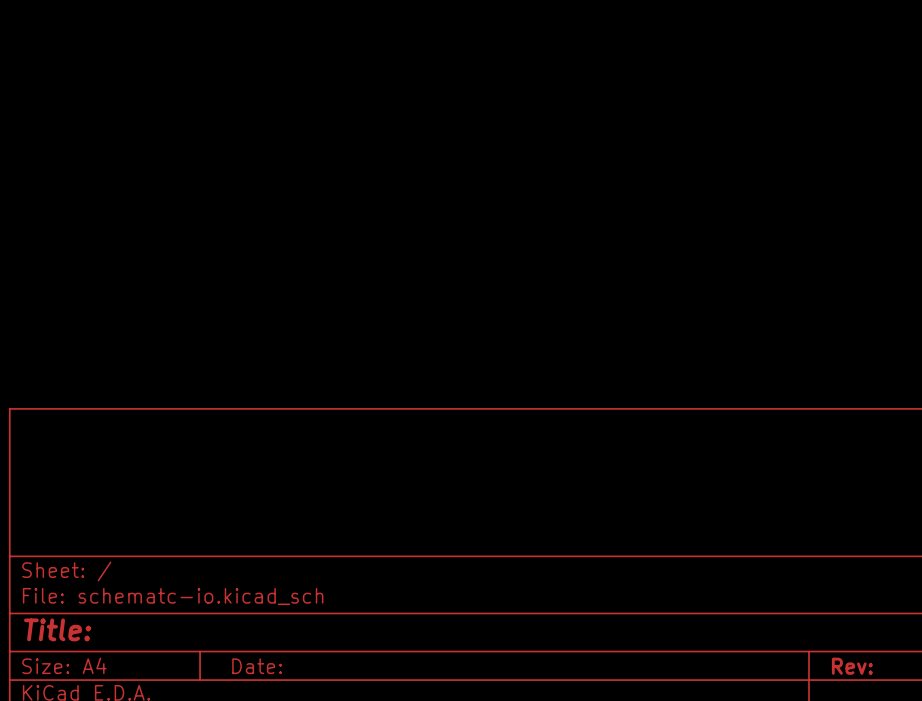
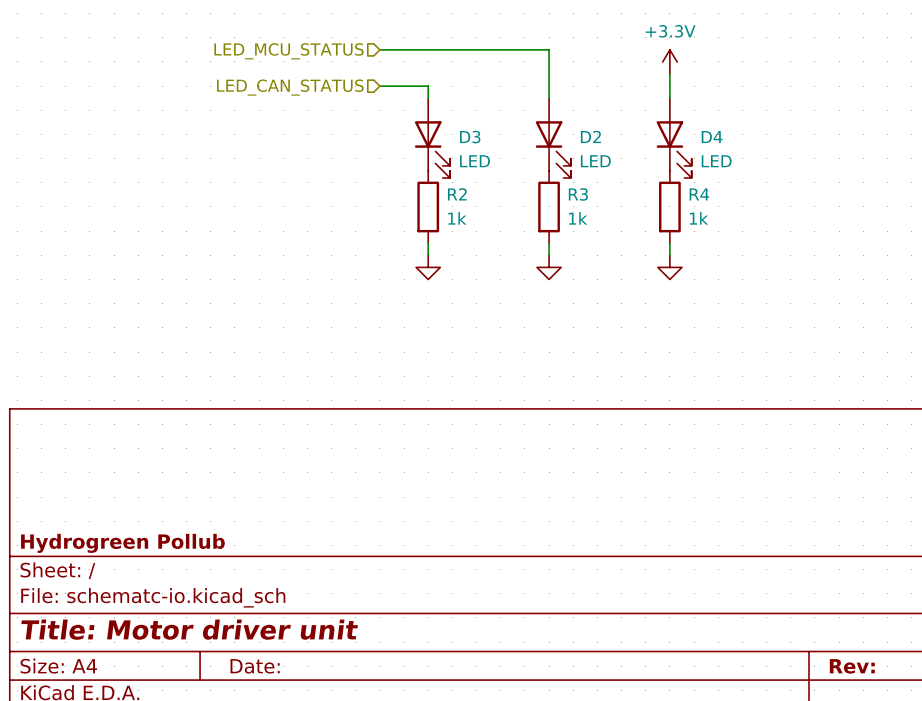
wire: none -> (379, 49) (549, 49) (549, 98)
hierarchical label: none -> LED_MCU_STATUS (288, 51)
power symbol: none -> +3.3V (669, 61)
wire: none -> (669, 74) (669, 98)
hierarchical label: none -> LED_CAN_STATUS (290, 87)
wire: none -> (379, 86) (428, 86) (428, 98)
D3: none -> LED (432, 138)
D2: none -> LED (553, 138)
D4: none -> LED (674, 138)
R2: none -> 1k (428, 206)
R3: none -> 1k (549, 206)
R4: none -> 1k (669, 206)
wire: none -> (428, 243) (428, 255)
wire: none -> (549, 243) (549, 255)
wire: none -> (669, 243) (669, 255)
power symbol: none -> (428, 267)
power symbol: none -> (549, 267)
power symbol: none -> (669, 267)
title block: none -> Hydrogreen Pollub (122, 543)
title block: Title: (57, 629) -> Title: Motor driver unit (189, 629)

